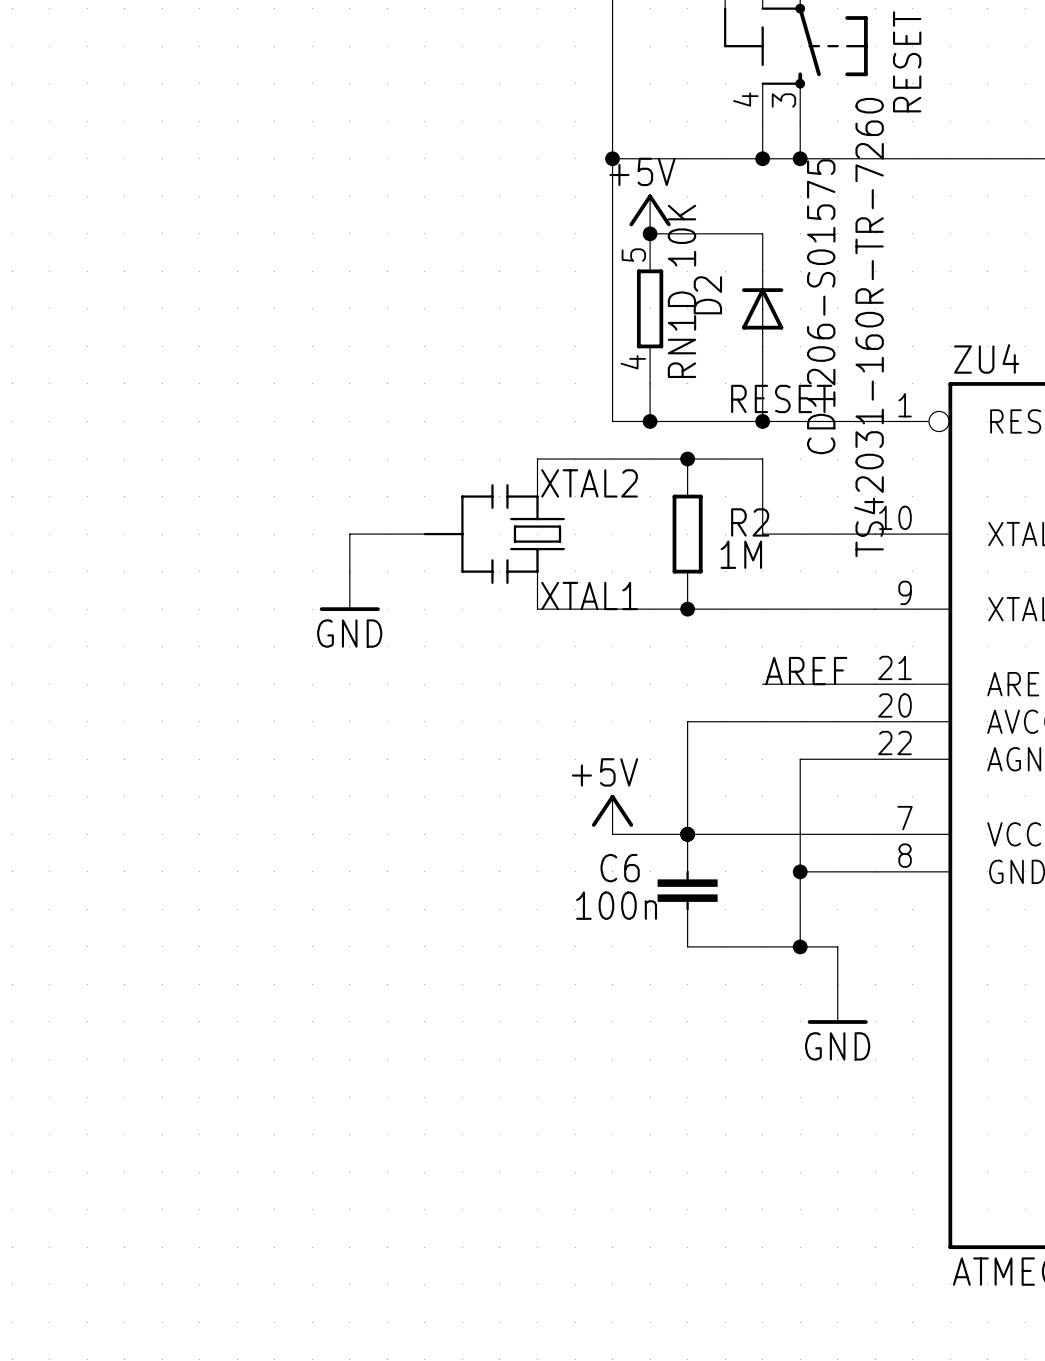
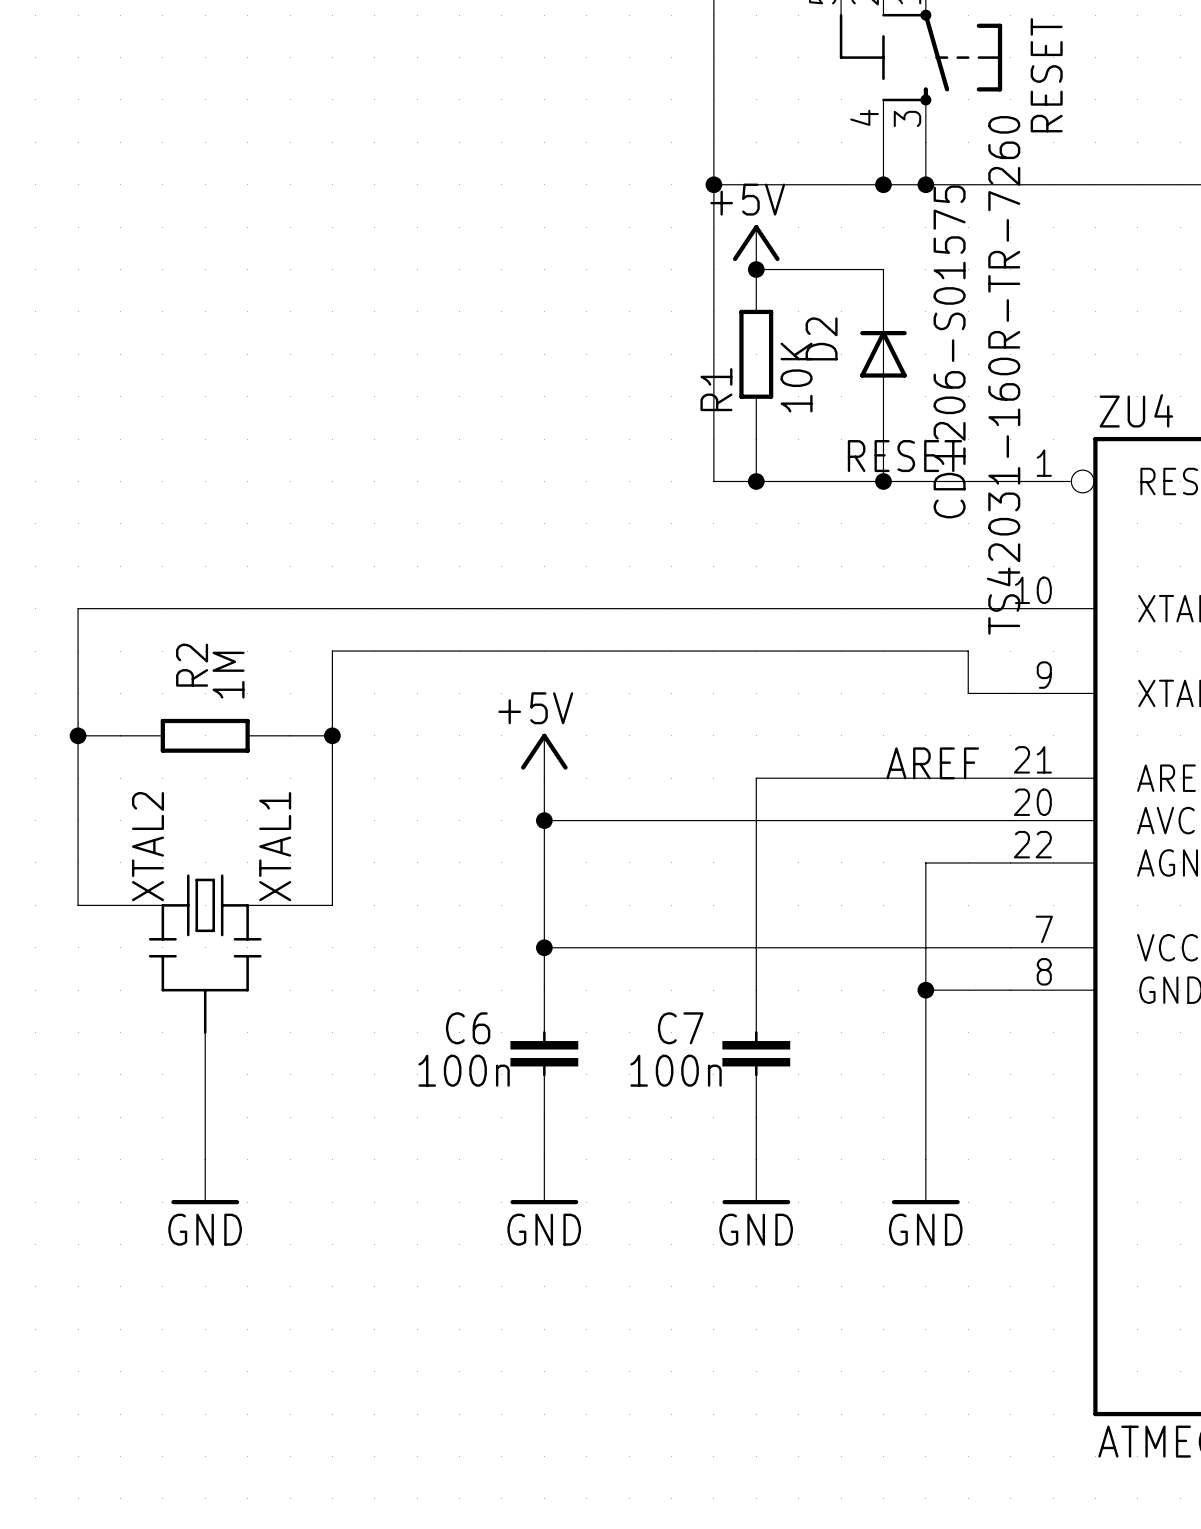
RN1D: 10K (650, 308) -> none
R1: none -> 10K (756, 354)
junction: (687, 459) -> none
label: XTAL2 (589, 483) -> none
wire: (537, 496) (537, 459) (762, 459) (762, 534) -> (501, 608) (883, 608)
R2 name position: R2 (750, 522) -> R2 (192, 665)
wire: (349, 534) (349, 571) -> (417, 608) (78, 608) (78, 905) (162, 905)
part: (494, 534) -> none
R2 rotation: 0° (687, 534) -> 90° clockwise (205, 735)
R2 position: (687, 534) -> (205, 735)
R2 value position: 1M (741, 554) -> 1M (228, 675)
wire: (537, 571) (537, 609) (837, 609) -> (247, 905) (332, 905) (332, 651) (968, 651) (968, 693)
power symbol: GND (349, 591) -> none
label rotation: 0° (589, 596) -> 90° counterclockwise (275, 846)
label position: XTAL1 (589, 596) -> XTAL1 (275, 846)
junction: (687, 609) -> none
wire: none -> (78, 735) (120, 735)
junction: none -> (78, 735)
wire: none -> (290, 735) (332, 735)
junction: none -> (332, 735)
wire: none -> (544, 778) (544, 990)
wire: none -> (883, 778) (756, 778) (756, 990)
junction: none -> (544, 820)
wire: (687, 721) (687, 834) -> (798, 820) (544, 820)
label: none -> XTAL2 (148, 846)
power symbol position: +5V (612, 814) -> +5V (544, 755)
wire: none -> (544, 947) (713, 947)
junction: none -> (544, 947)
junction: (687, 834) -> none
part: none -> (205, 954)
C6 position: (687, 890) -> (544, 1053)
wire: none -> (205, 1032) (205, 1159)
C7: none -> 100n (756, 1053)
wire: (687, 946) (837, 946) (837, 984) -> none
wire: none -> (925, 1074) (925, 1159)
junction: (800, 946) -> none
wire: none -> (544, 1117) (544, 1159)
wire: none -> (756, 1117) (756, 1159)
power symbol position: GND (837, 1004) -> GND (925, 1181)
power symbol: none -> GND (205, 1181)
power symbol: none -> GND (544, 1181)
power symbol: none -> GND (756, 1181)

